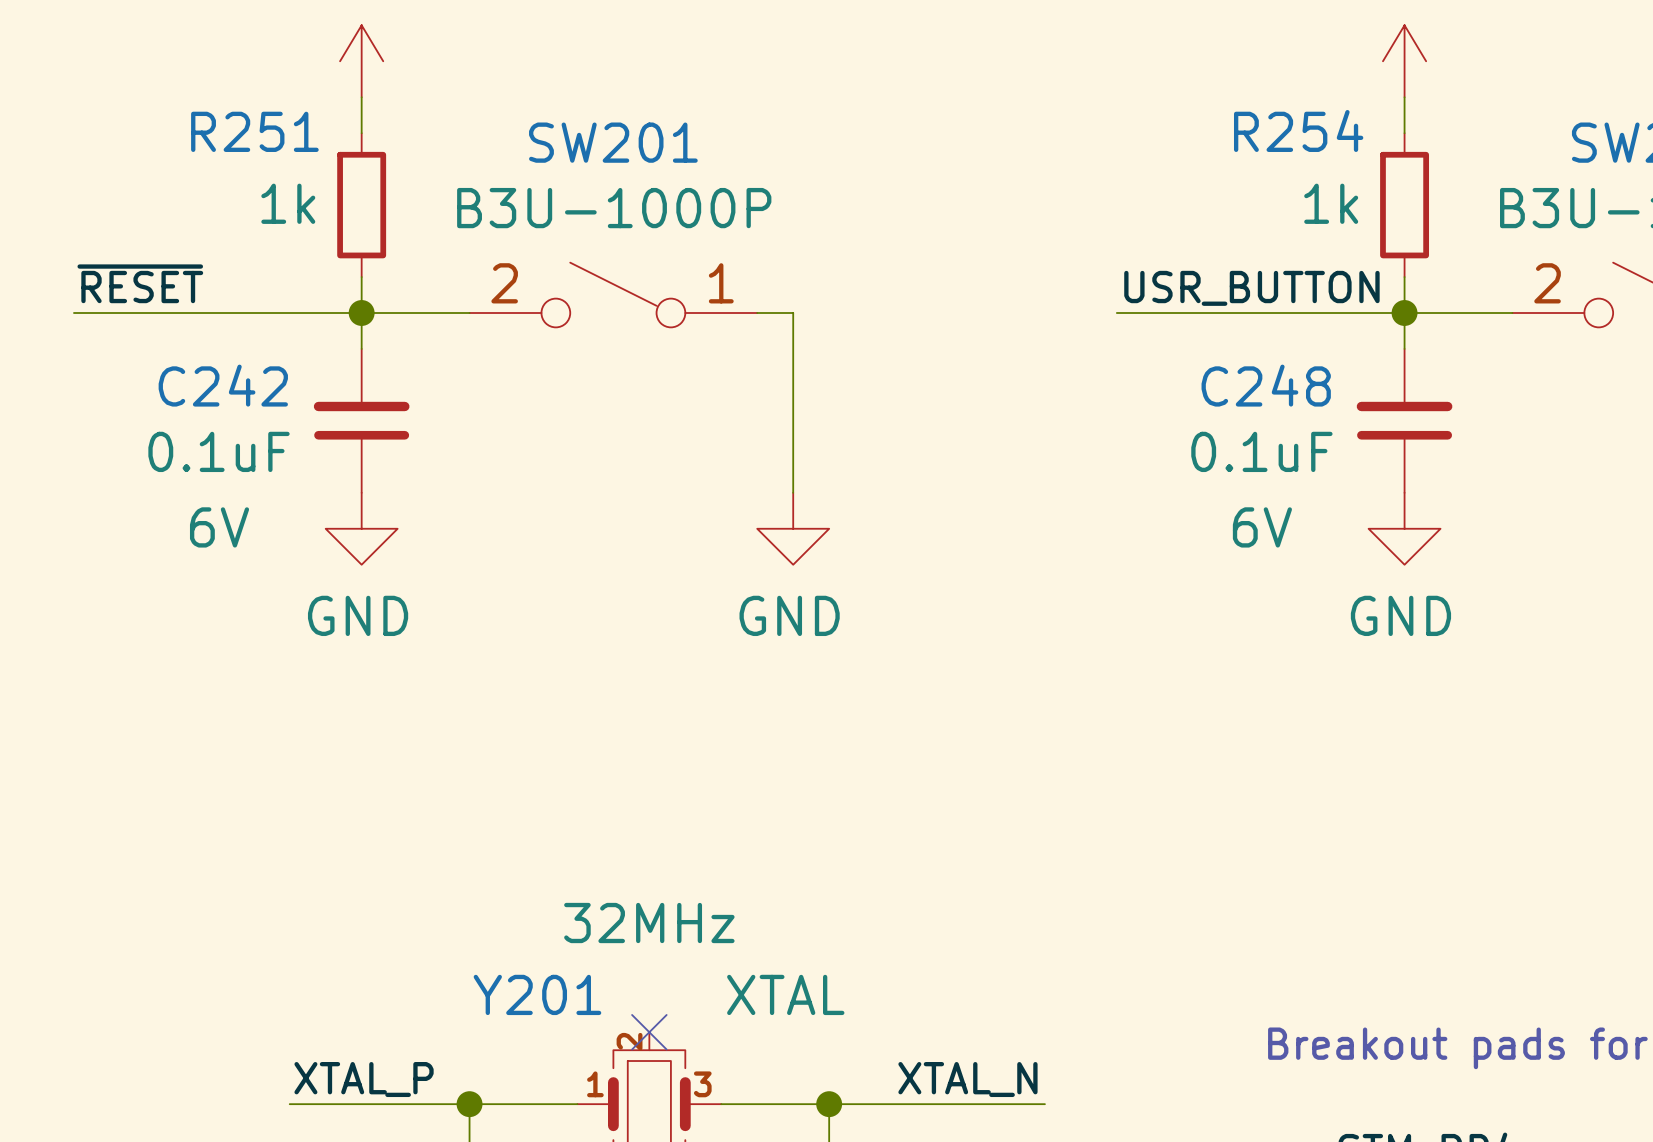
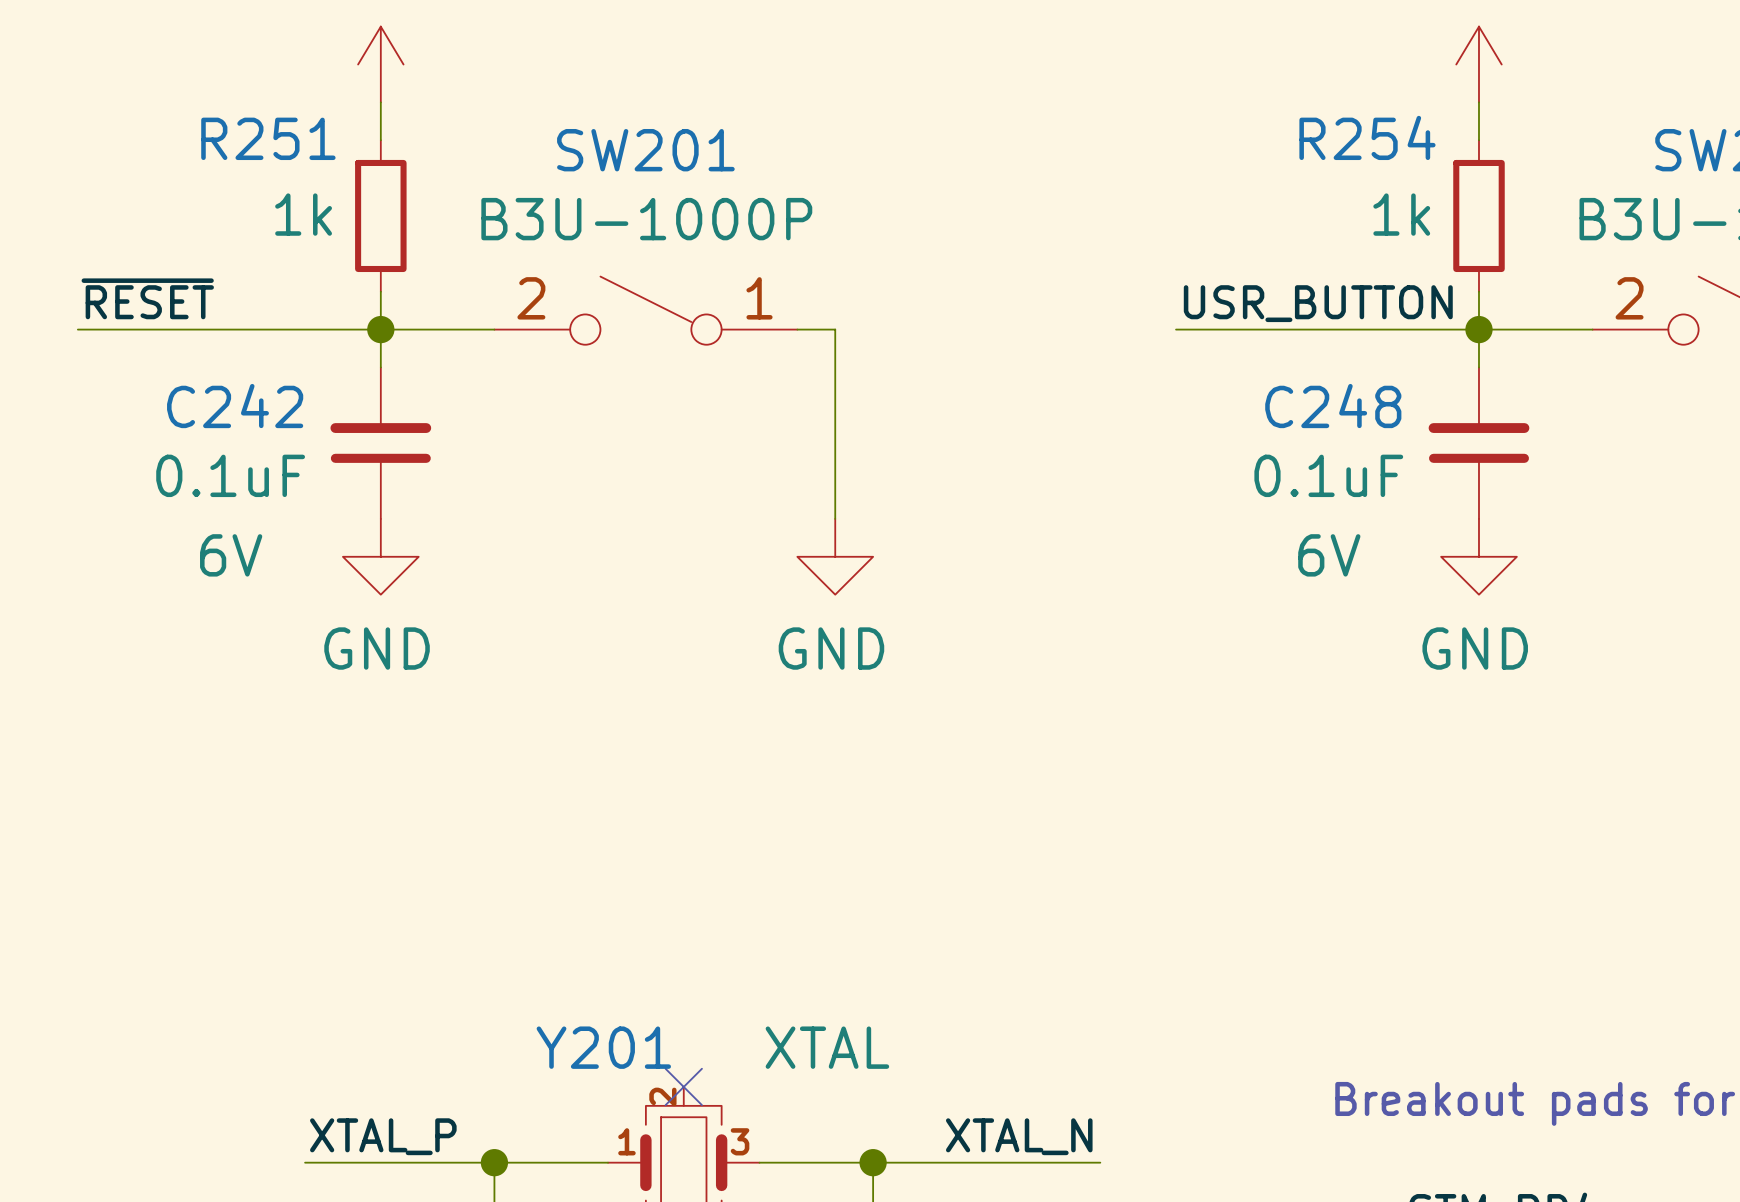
Y201 text: 32MHz (649, 923) -> none
Y201 name position: Y201 (537, 994) -> Y201 (603, 1047)

